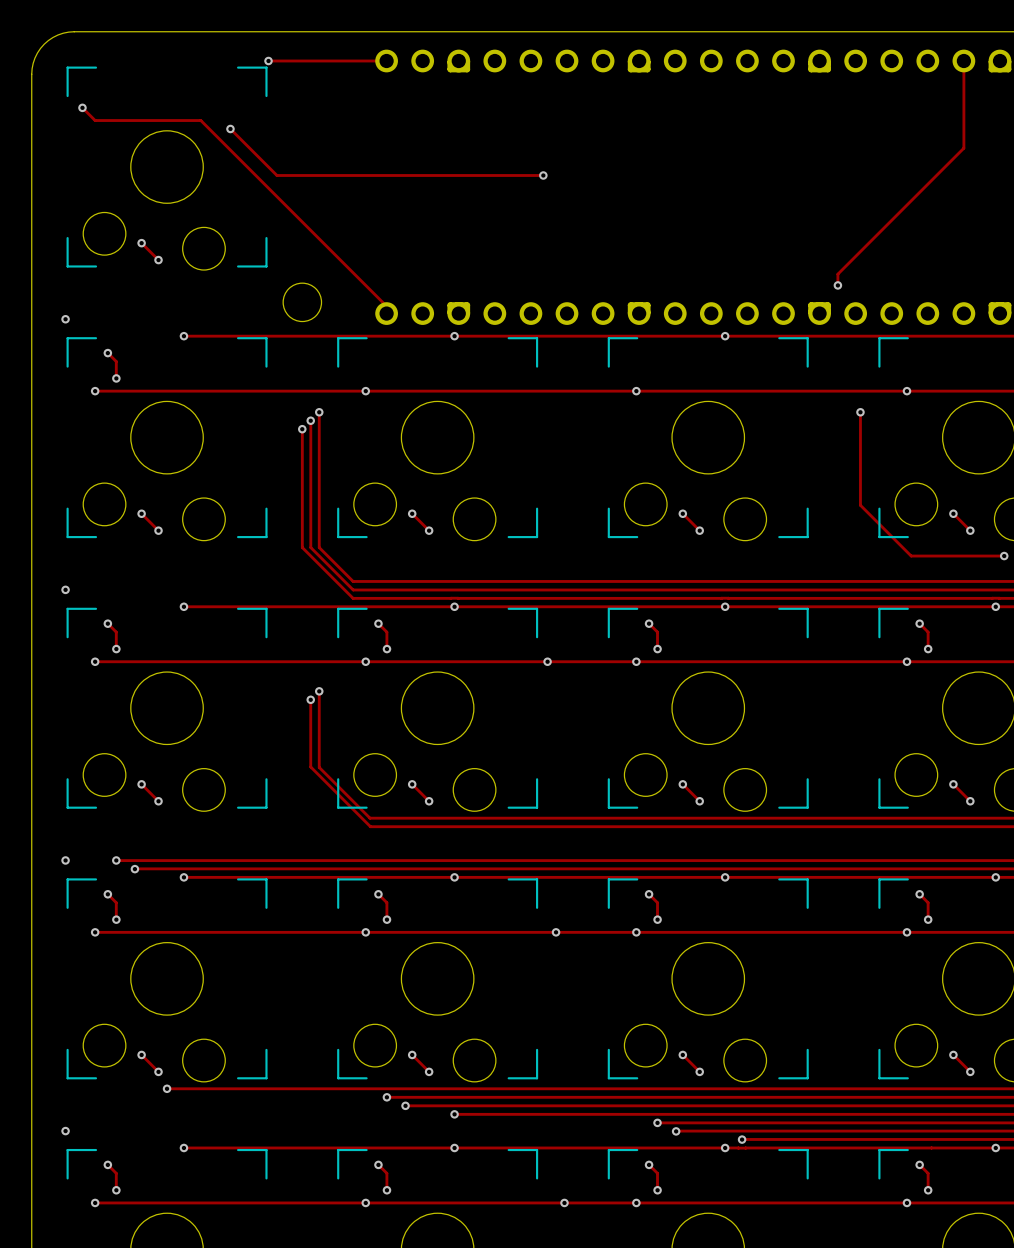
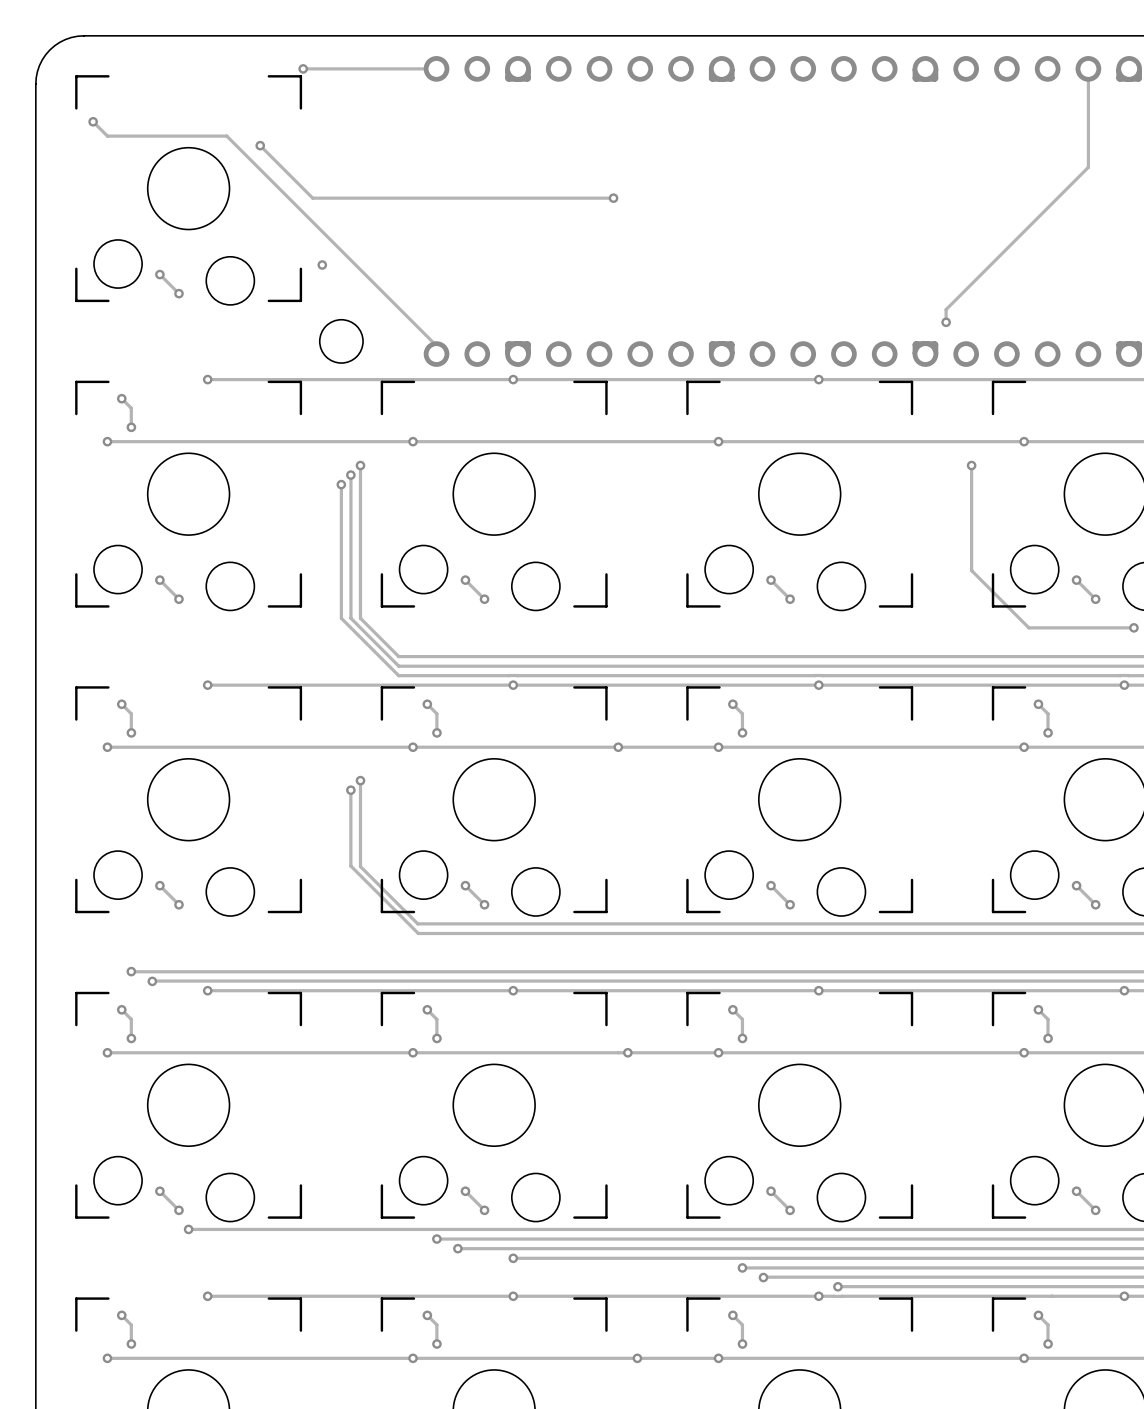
via: none -> (322, 265)
via: (65, 319) -> none
via: (65, 589) -> none
via: (65, 860) -> none
via: (65, 1131) -> none

